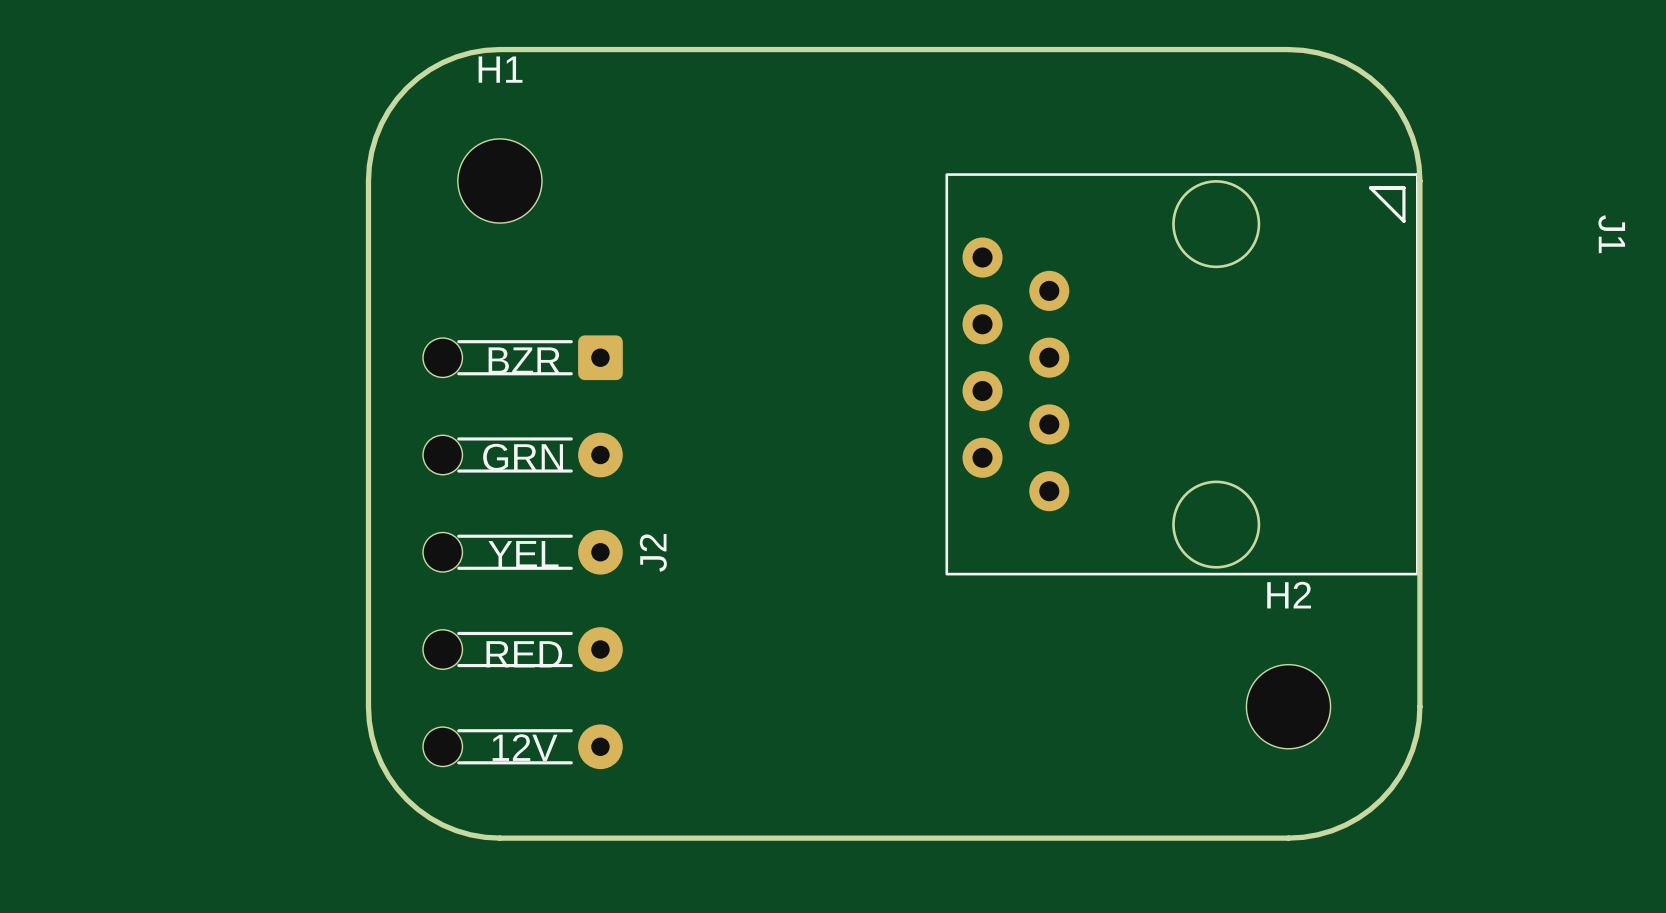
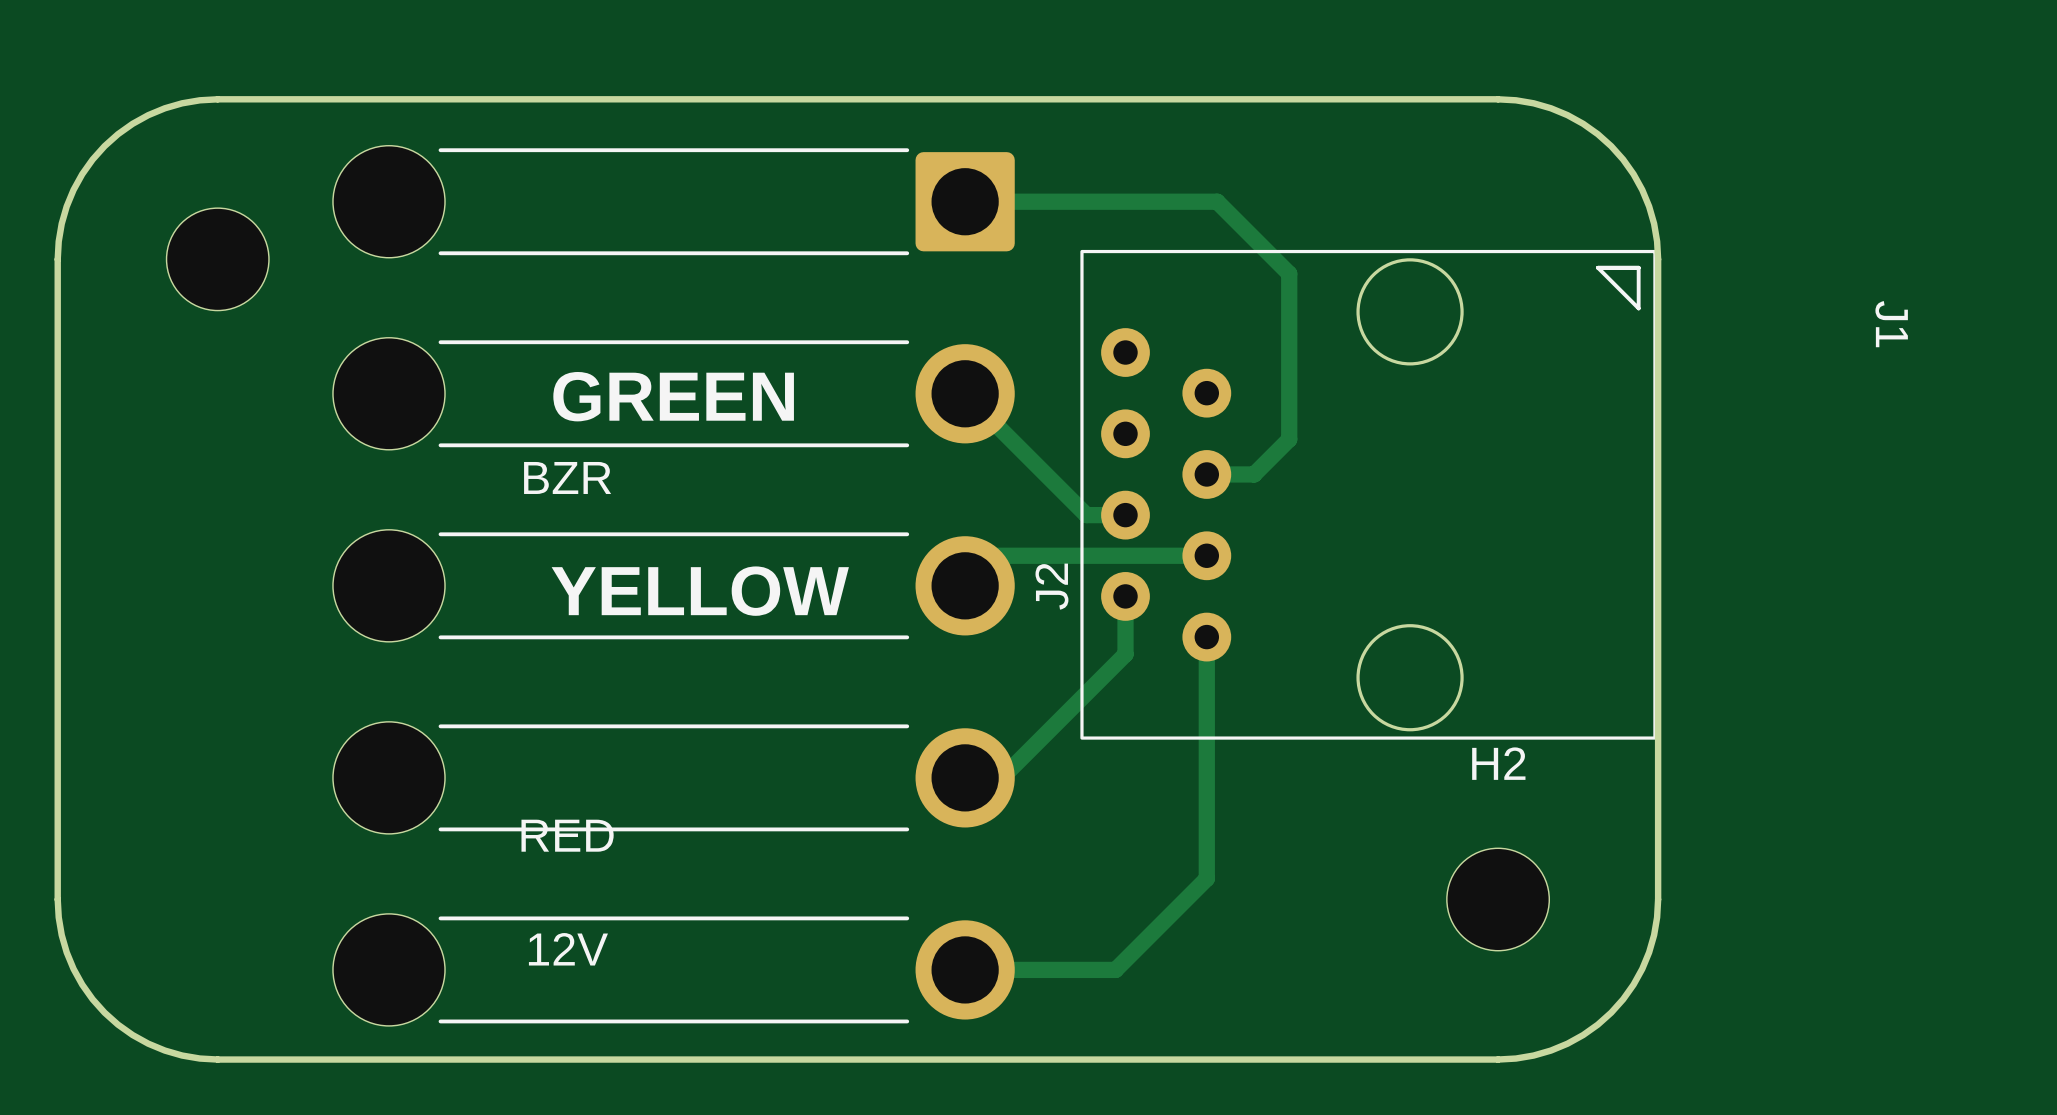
board edge: (499, 49) (485, 50) (456, 56) (429, 69) (406, 88) (388, 111) (375, 137) (369, 166) (368, 180) (368, 706) (371, 735) (381, 763) (388, 776) (406, 799) (417, 809) (442, 825) (456, 830) (470, 834) (499, 838) -> (537, 99) (217, 99) (182, 103) (164, 108) (132, 123) (117, 134) (92, 159) (73, 189) (66, 206) (58, 241) (57, 259) (57, 899) (61, 935) (73, 968) (82, 984) (104, 1012) (132, 1035) (164, 1050) (199, 1058) (537, 1059)
track: none -> (965, 201) (1217, 201) (1289, 273) (1289, 439) (1254, 474) (1206, 474)
H1 position: (499, 180) -> (217, 259)
track: none -> (965, 393) (1086, 515) (1125, 515)
text: none -> GREEN (673, 396)
J2 footprint: [423, 335, 623, 770] -> [332, 145, 1015, 1026]
track: none -> (1206, 555) (995, 555) (965, 585)
text: GRN (523, 457) -> YELLOW (700, 591)
track: none -> (1125, 596) (1125, 654) (1001, 777) (965, 777)
track: none -> (1206, 637) (1206, 878) (1115, 969) (965, 969)
J2 name position: J2 (653, 552) -> J2 (1051, 586)
text: YEL (523, 554) -> none

